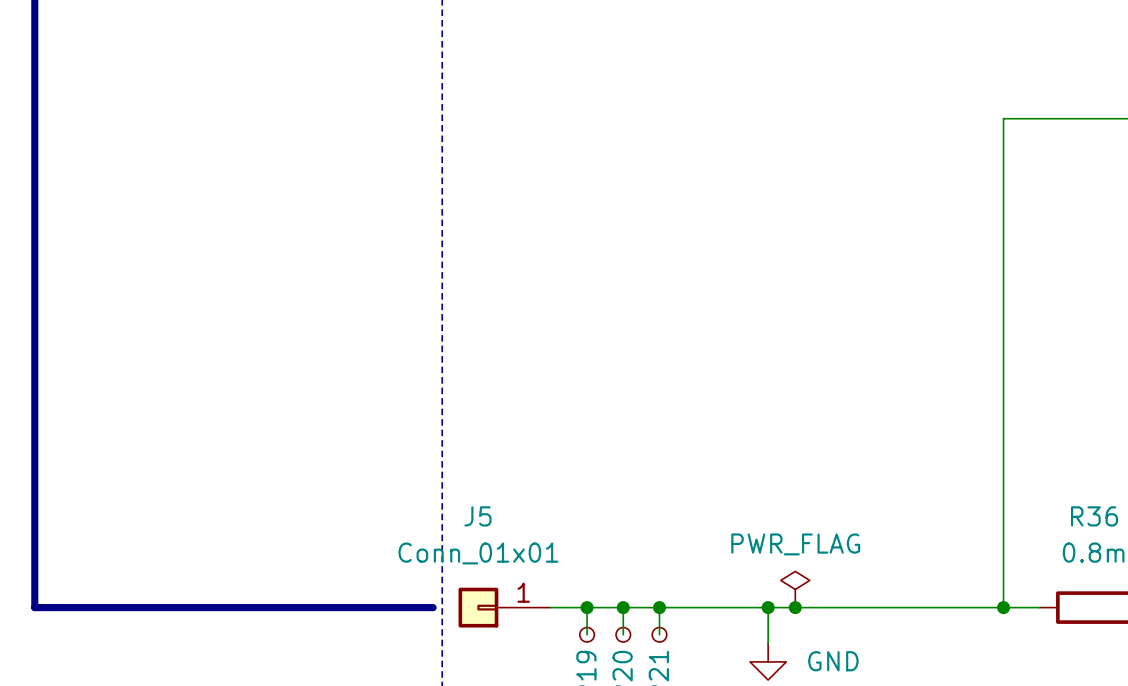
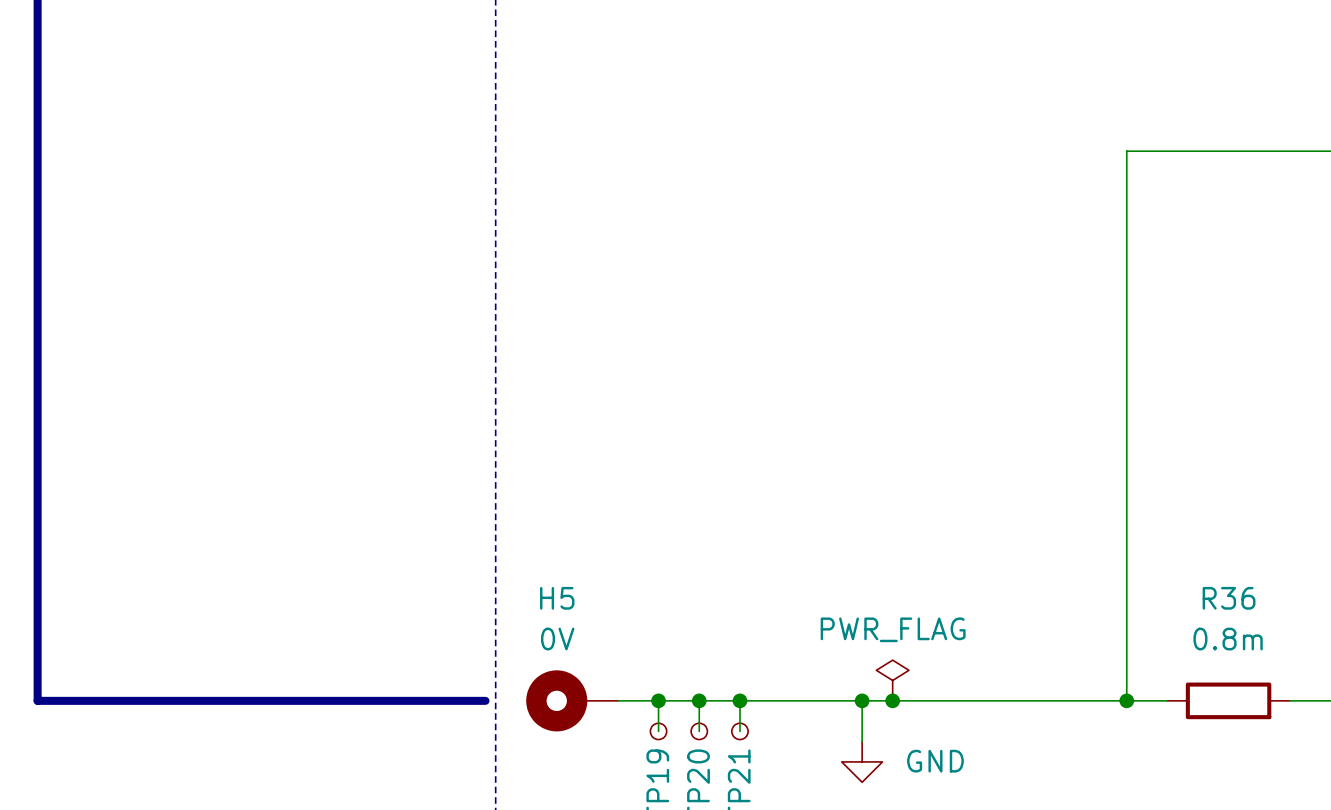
J5: Conn_01x01 (504, 607) -> none
H5: none -> 0V (572, 700)

